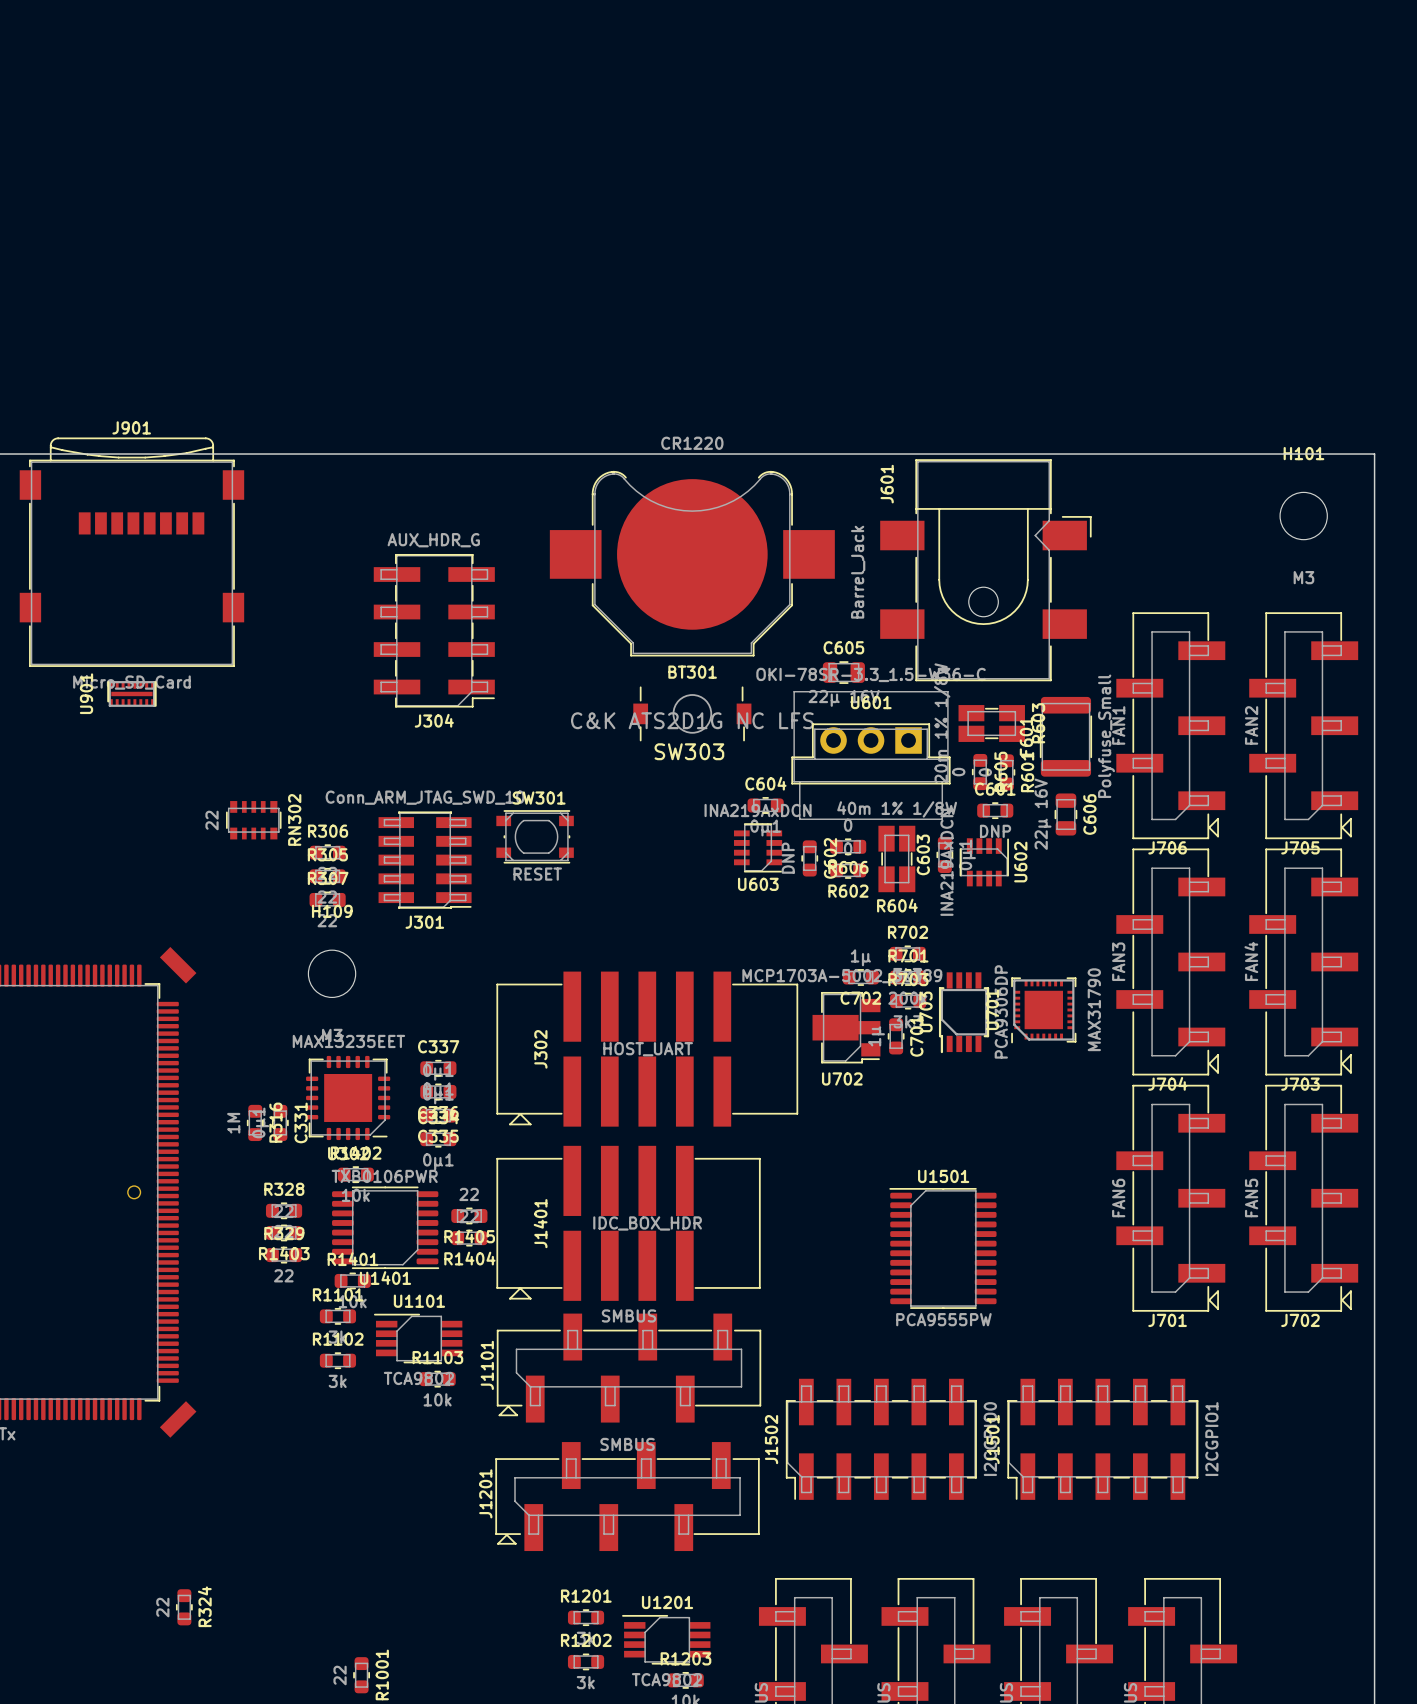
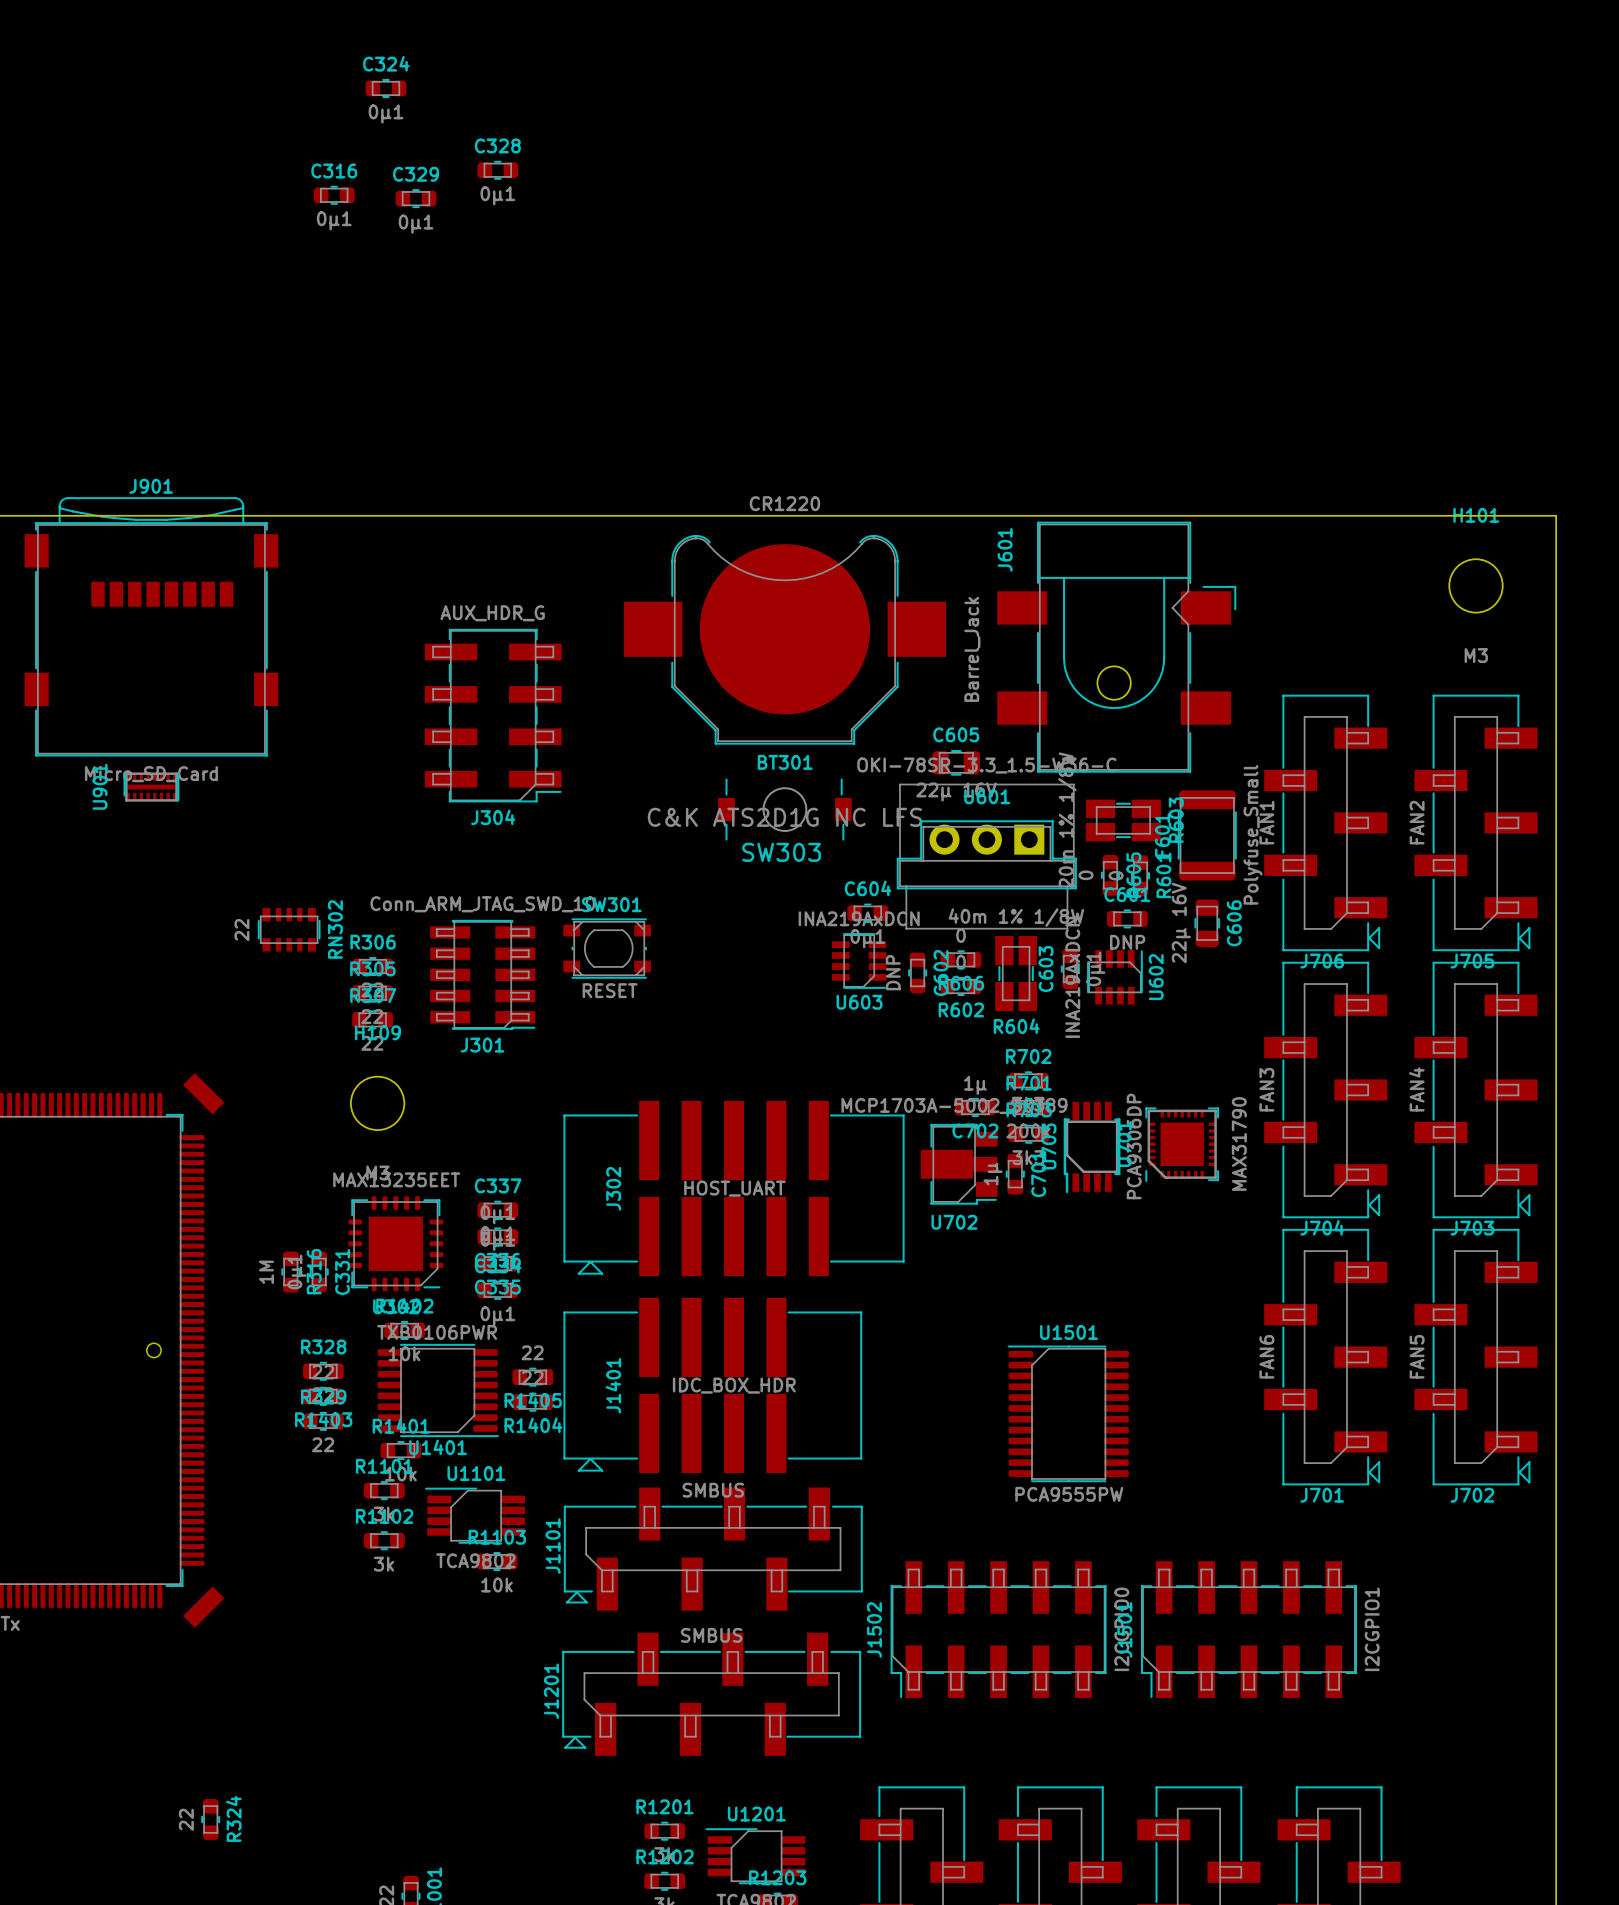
C324: none -> 0µ1 (385, 88)
C328: none -> 0µ1 (497, 170)
C316: none -> 0µ1 (334, 195)
C329: none -> 0µ1 (416, 198)

